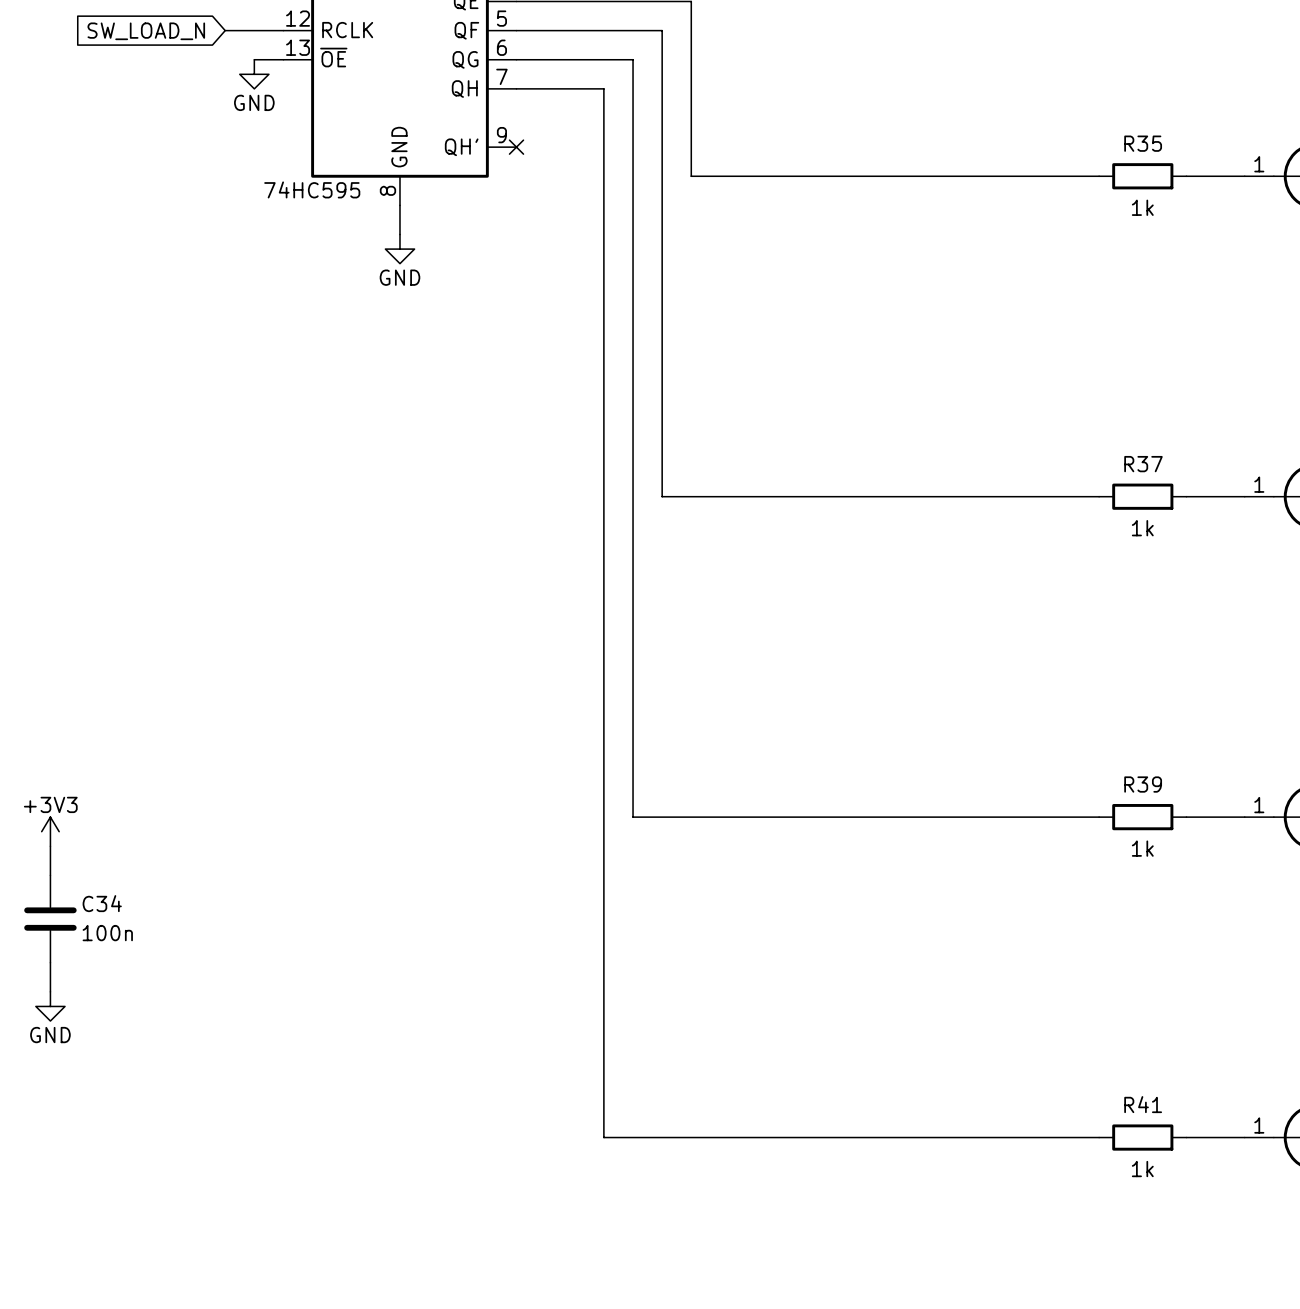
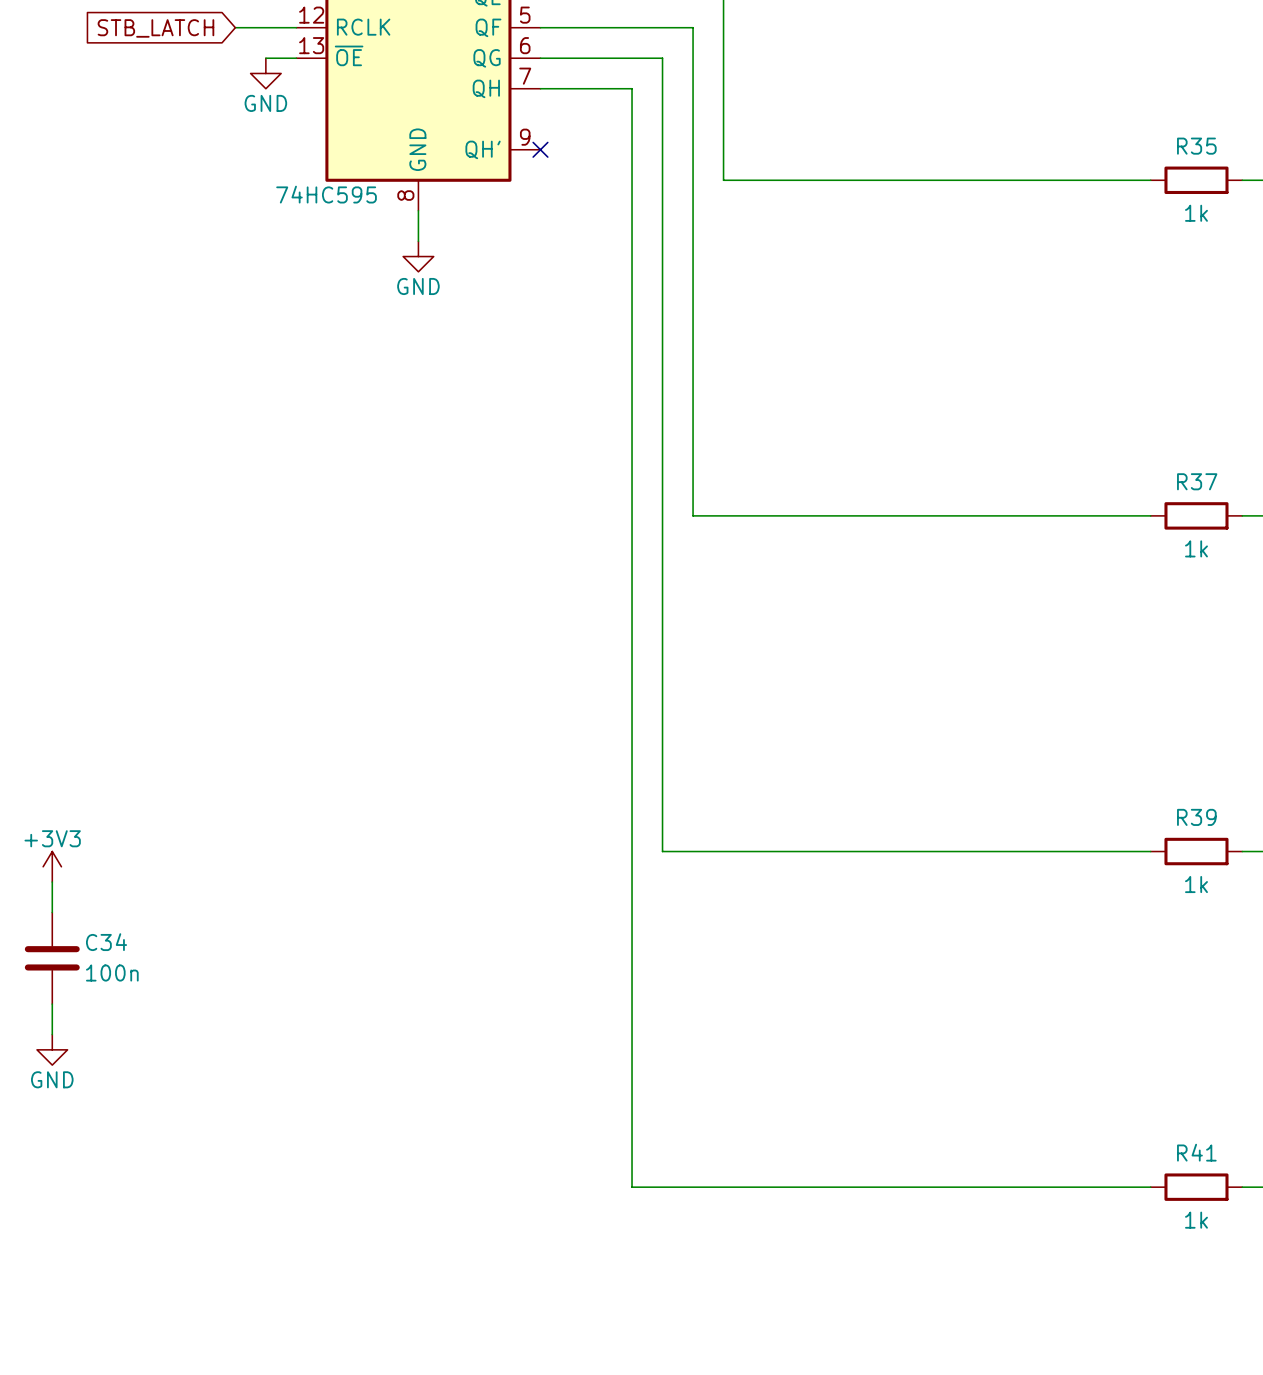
global label: SW_LOAD_N (146, 31) -> STB_LATCH (155, 28)

